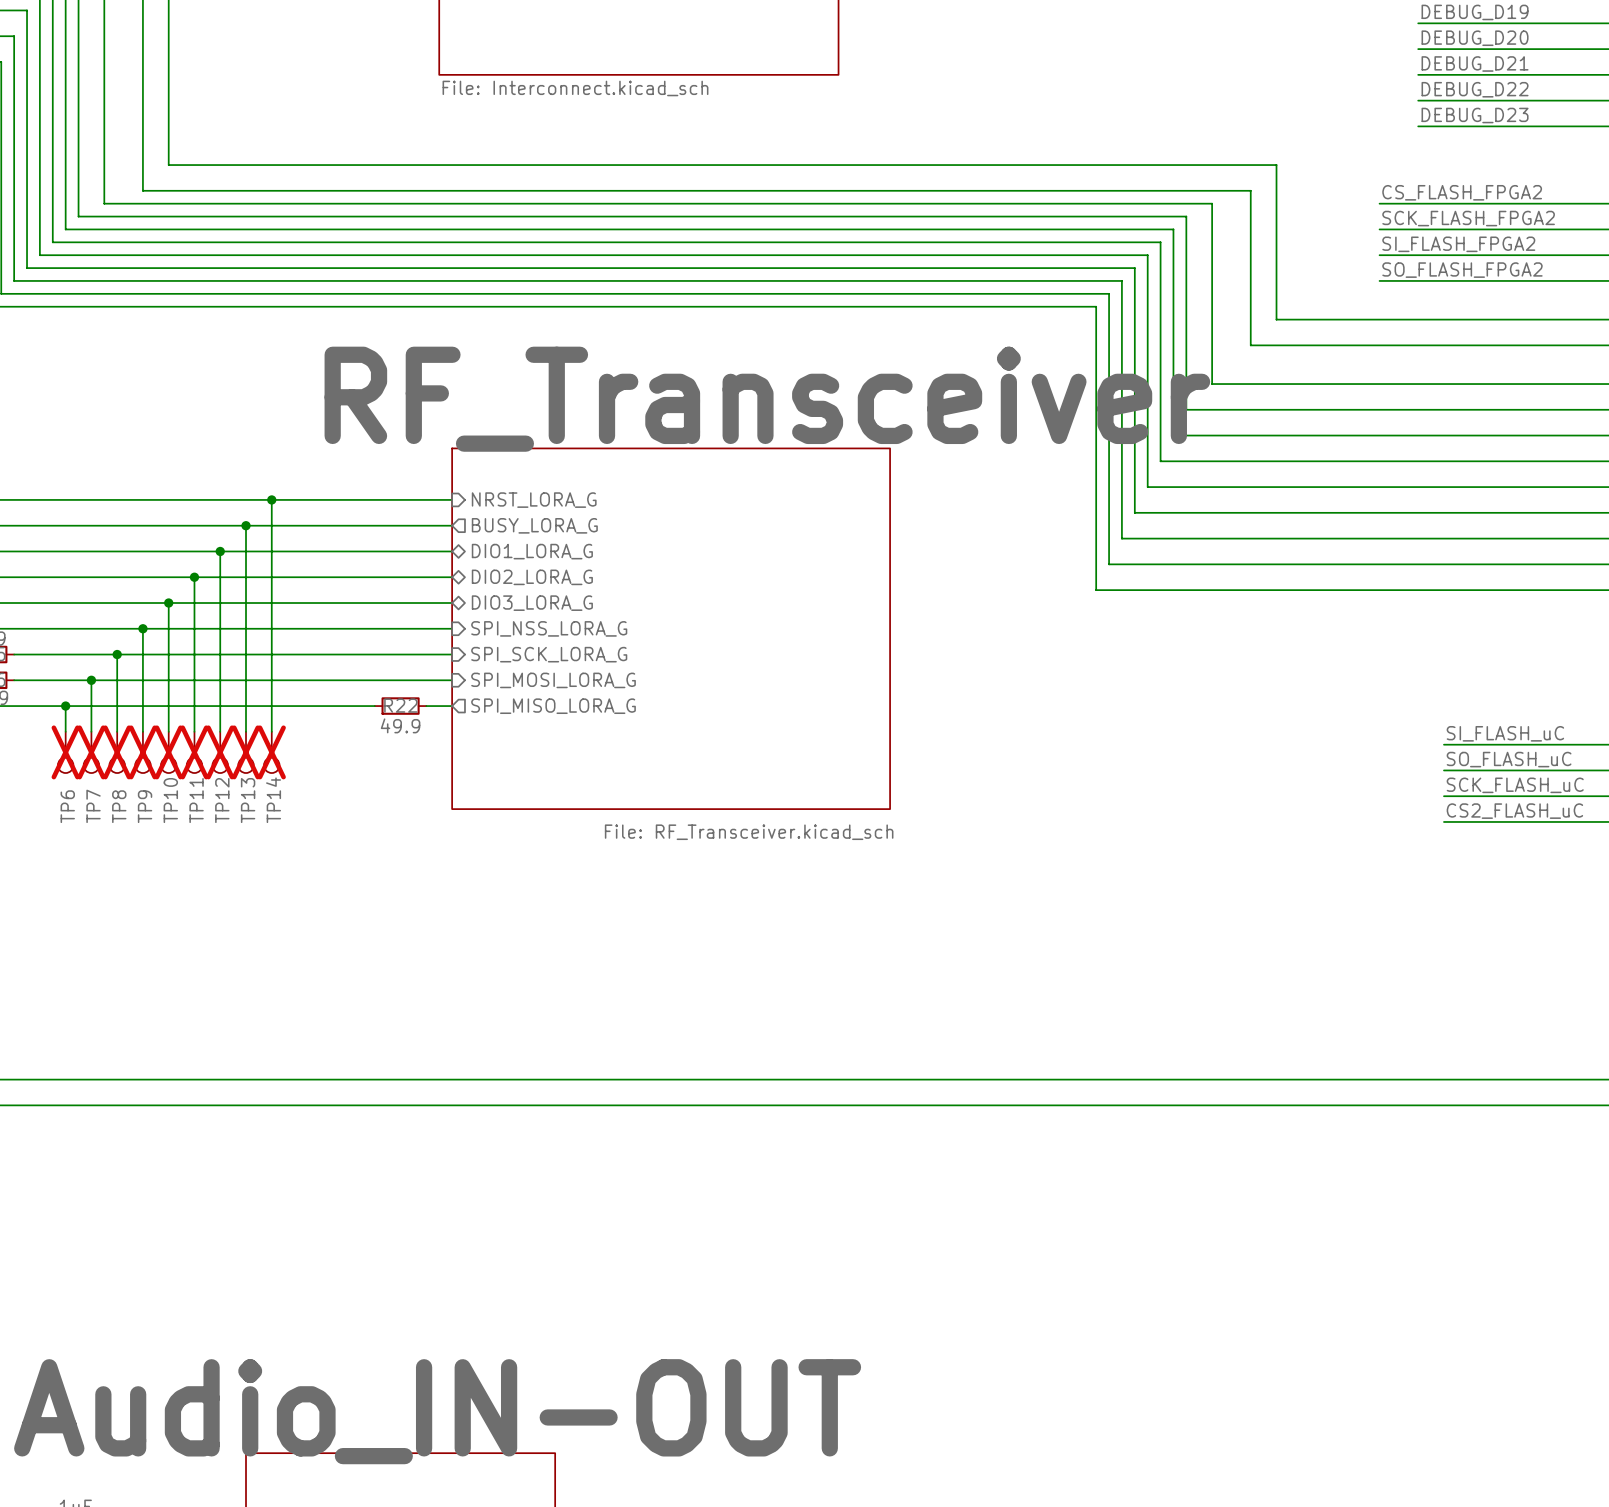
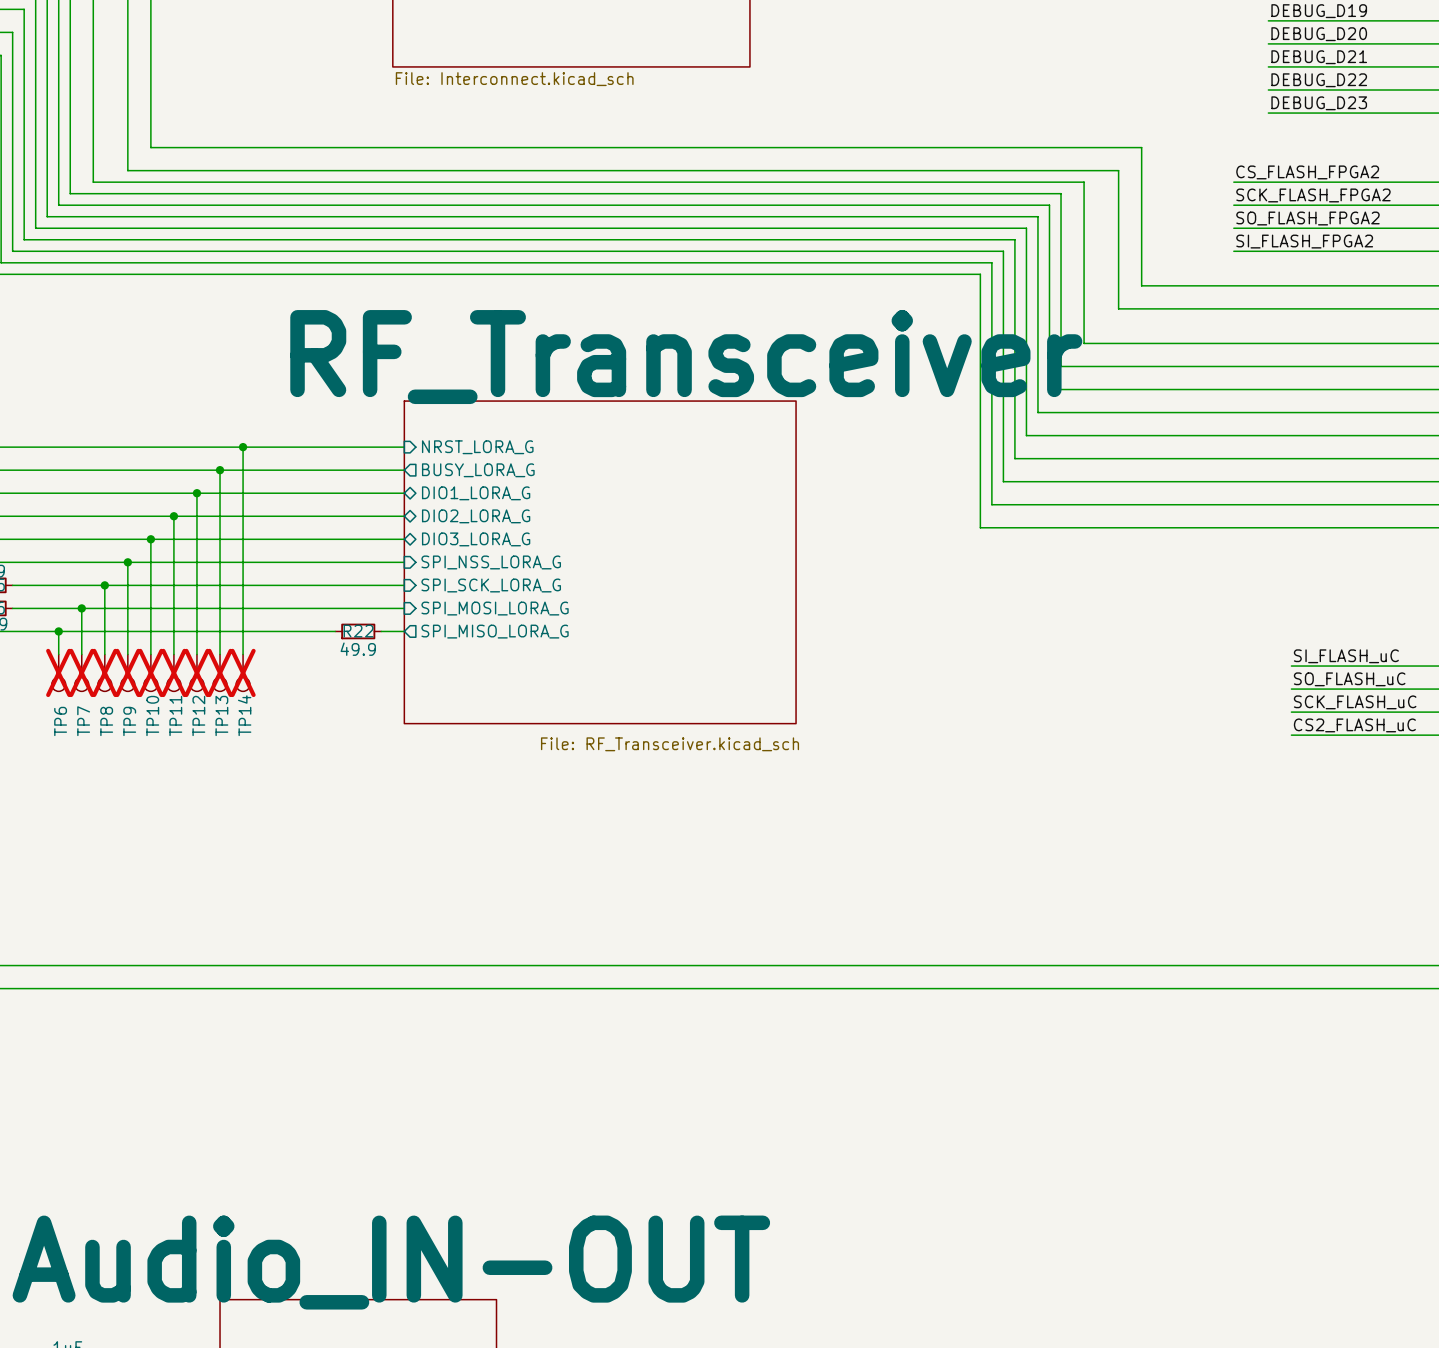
label: SI_FLASH_FPGA2 (1458, 244) -> SO_FLASH_FPGA2 (1307, 218)
label: SO_FLASH_FPGA2 (1462, 270) -> SI_FLASH_FPGA2 (1304, 241)

